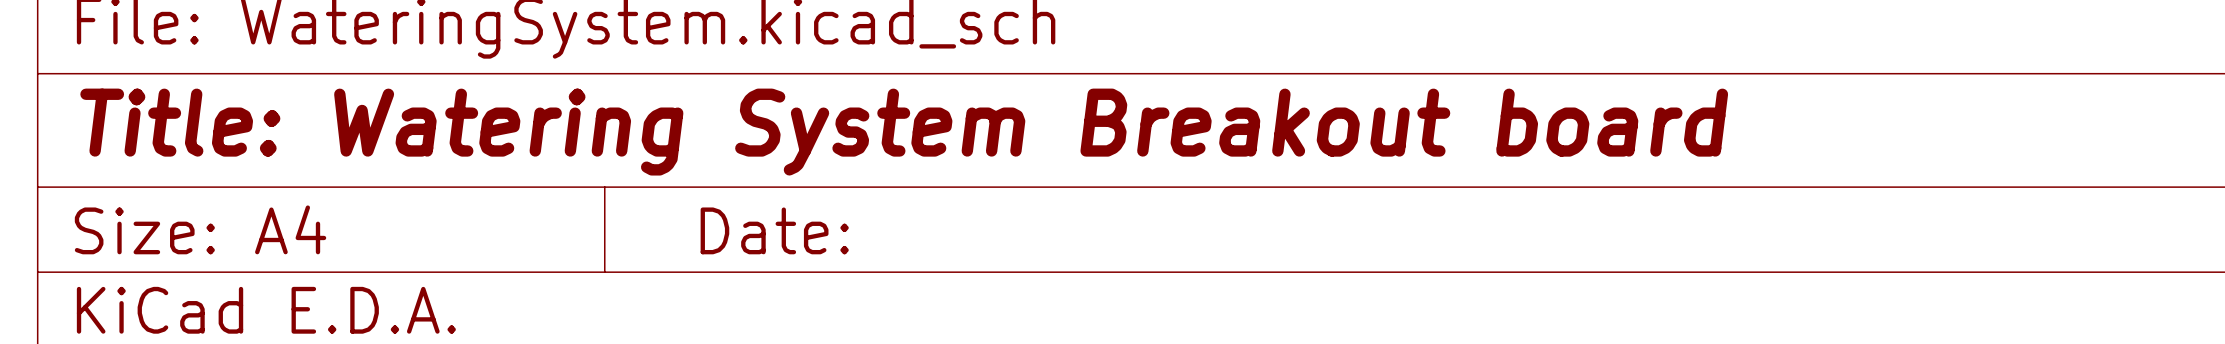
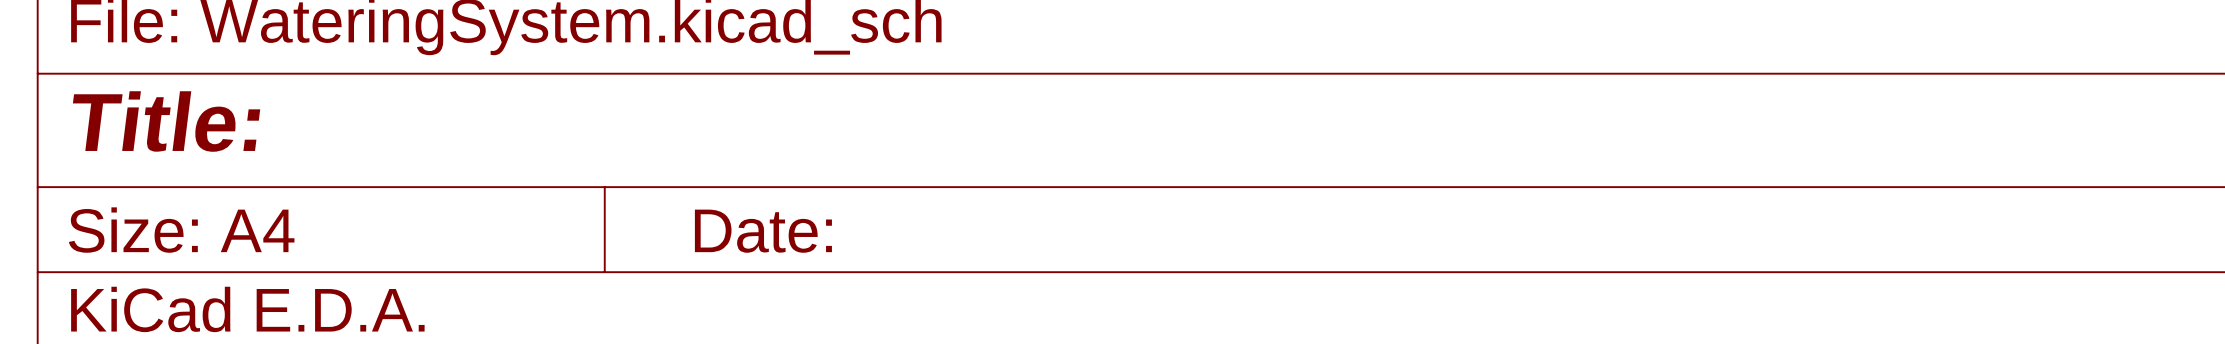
title block: Title: Watering System Breakout board (904, 132) -> Title: (166, 121)

